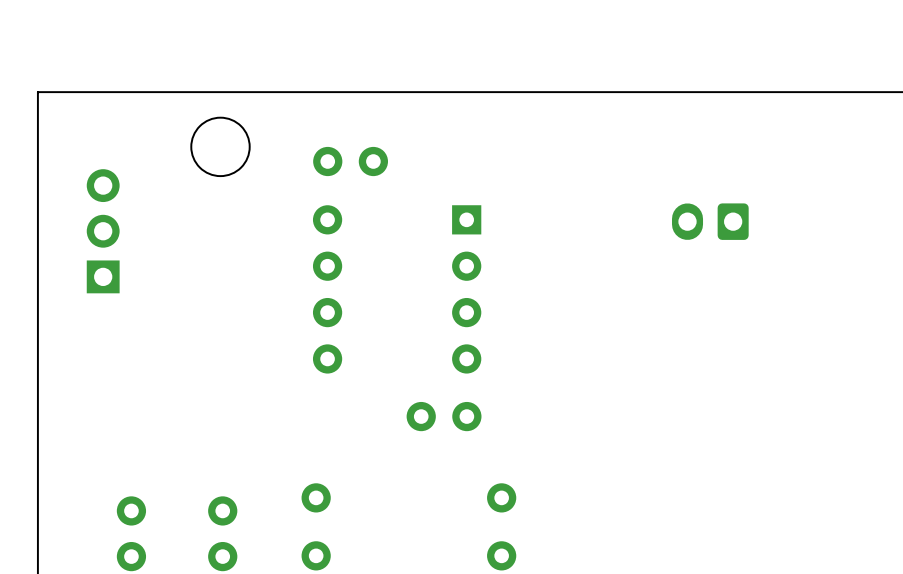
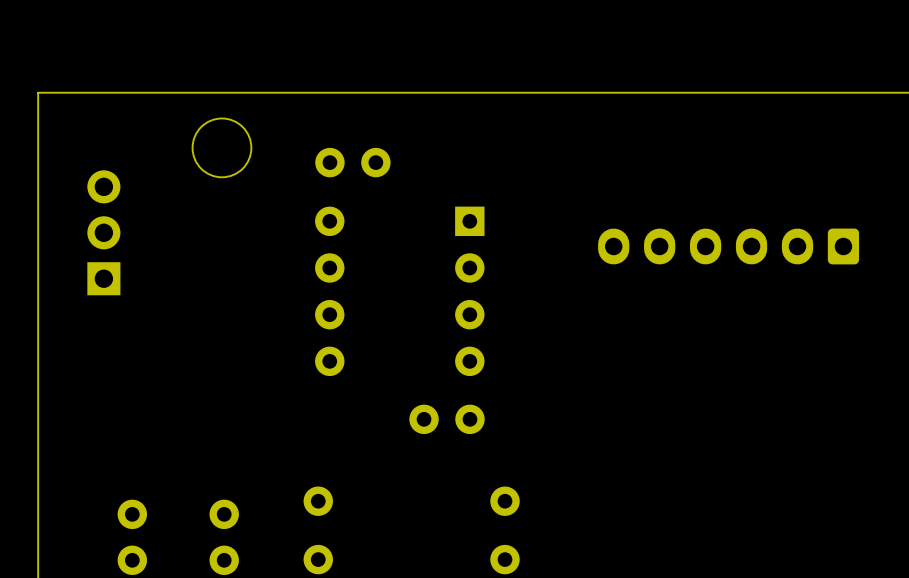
part: (710, 221) -> none
part: none -> (728, 246)

